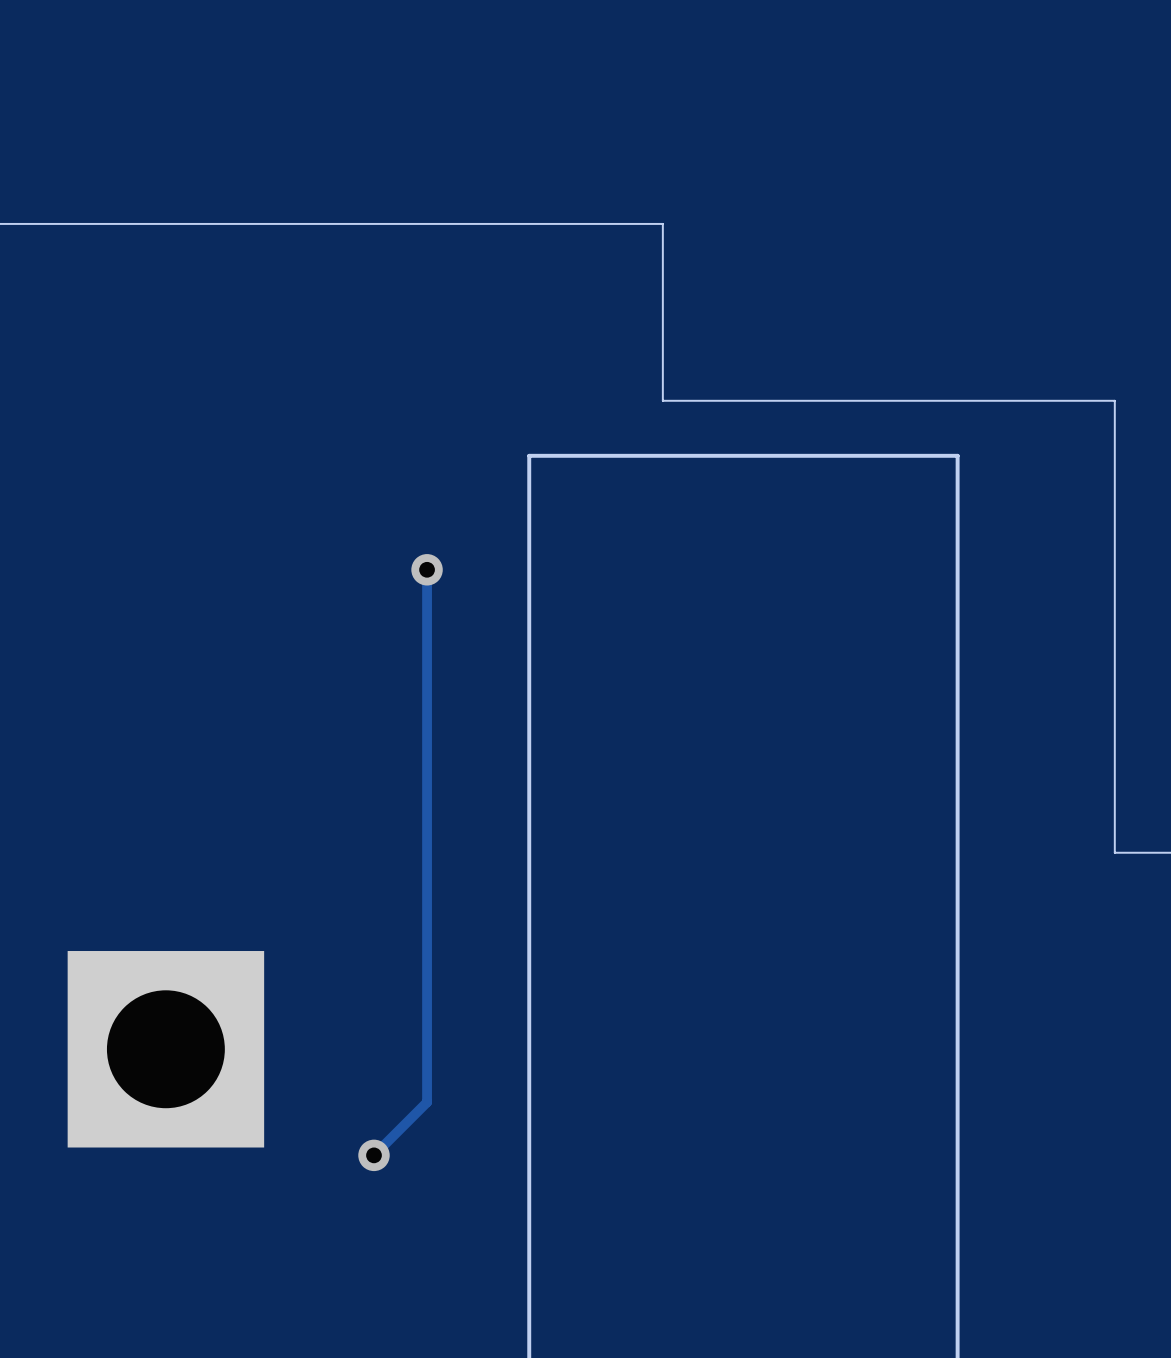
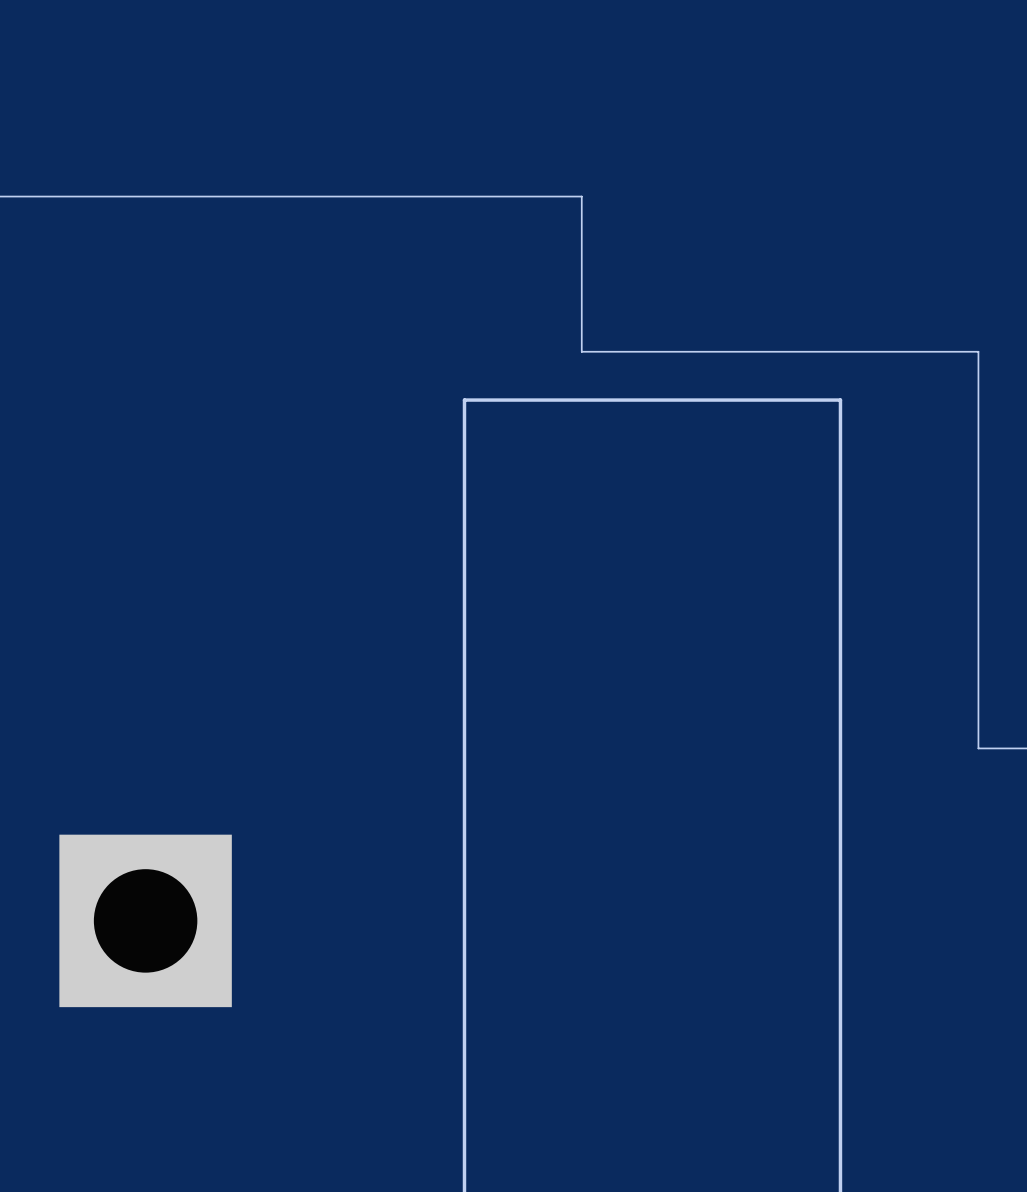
track: (427, 569) (427, 1102) (373, 1155) -> none
via: (427, 569) -> none
via: (373, 1155) -> none

